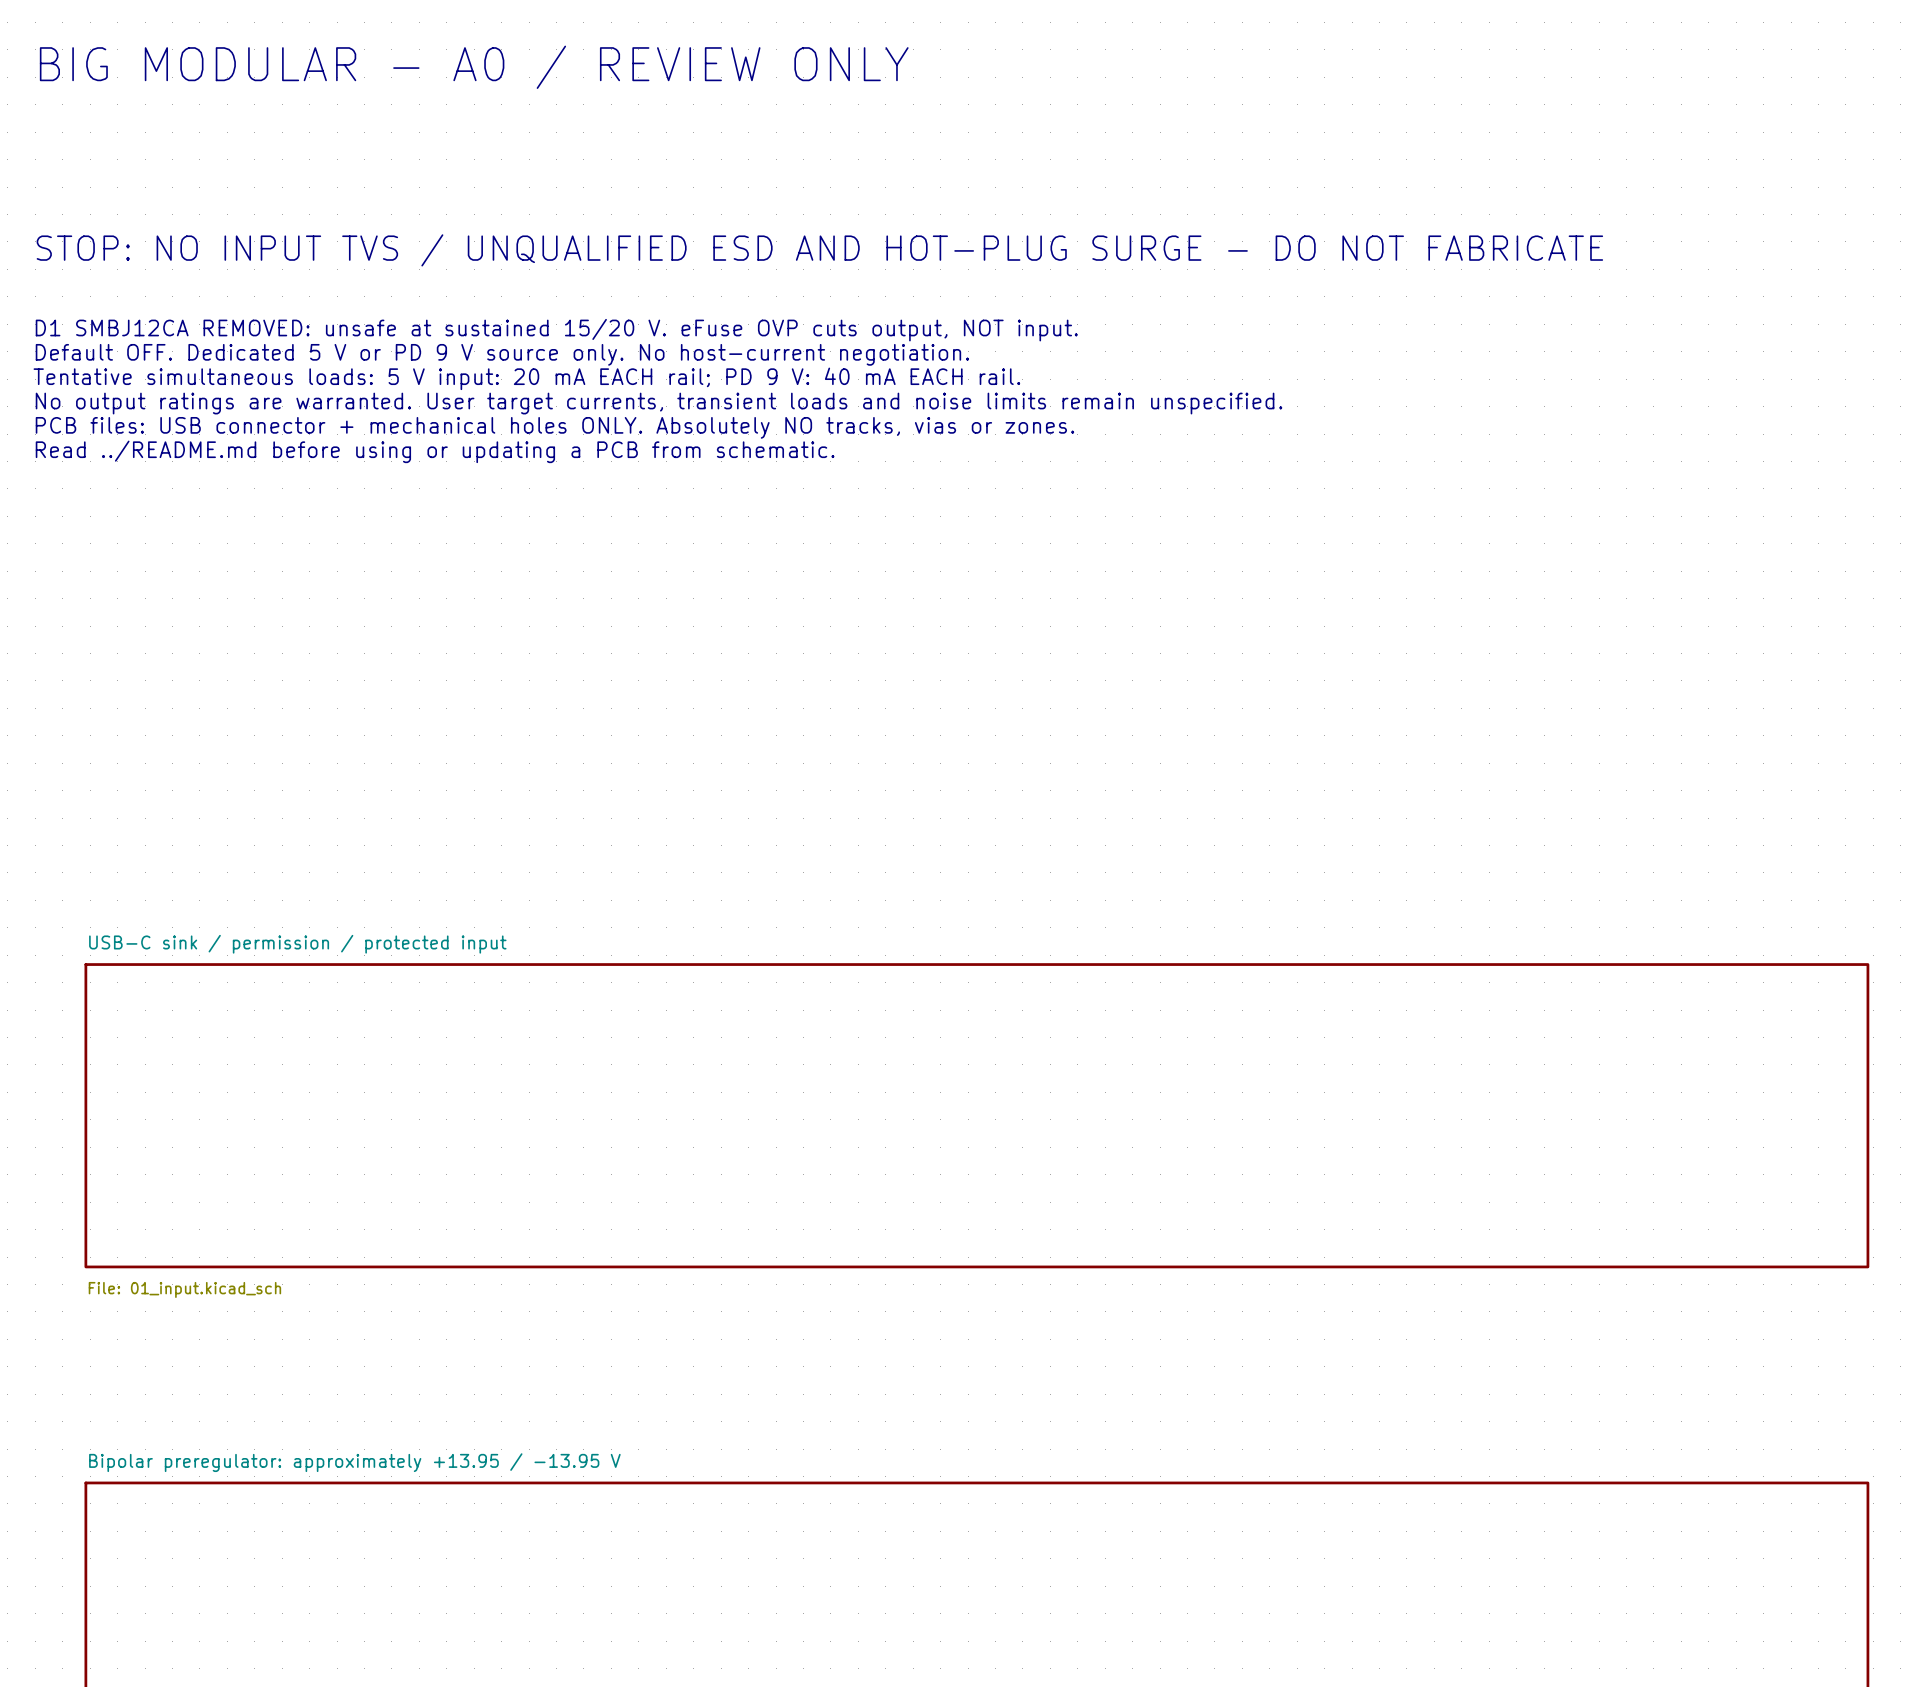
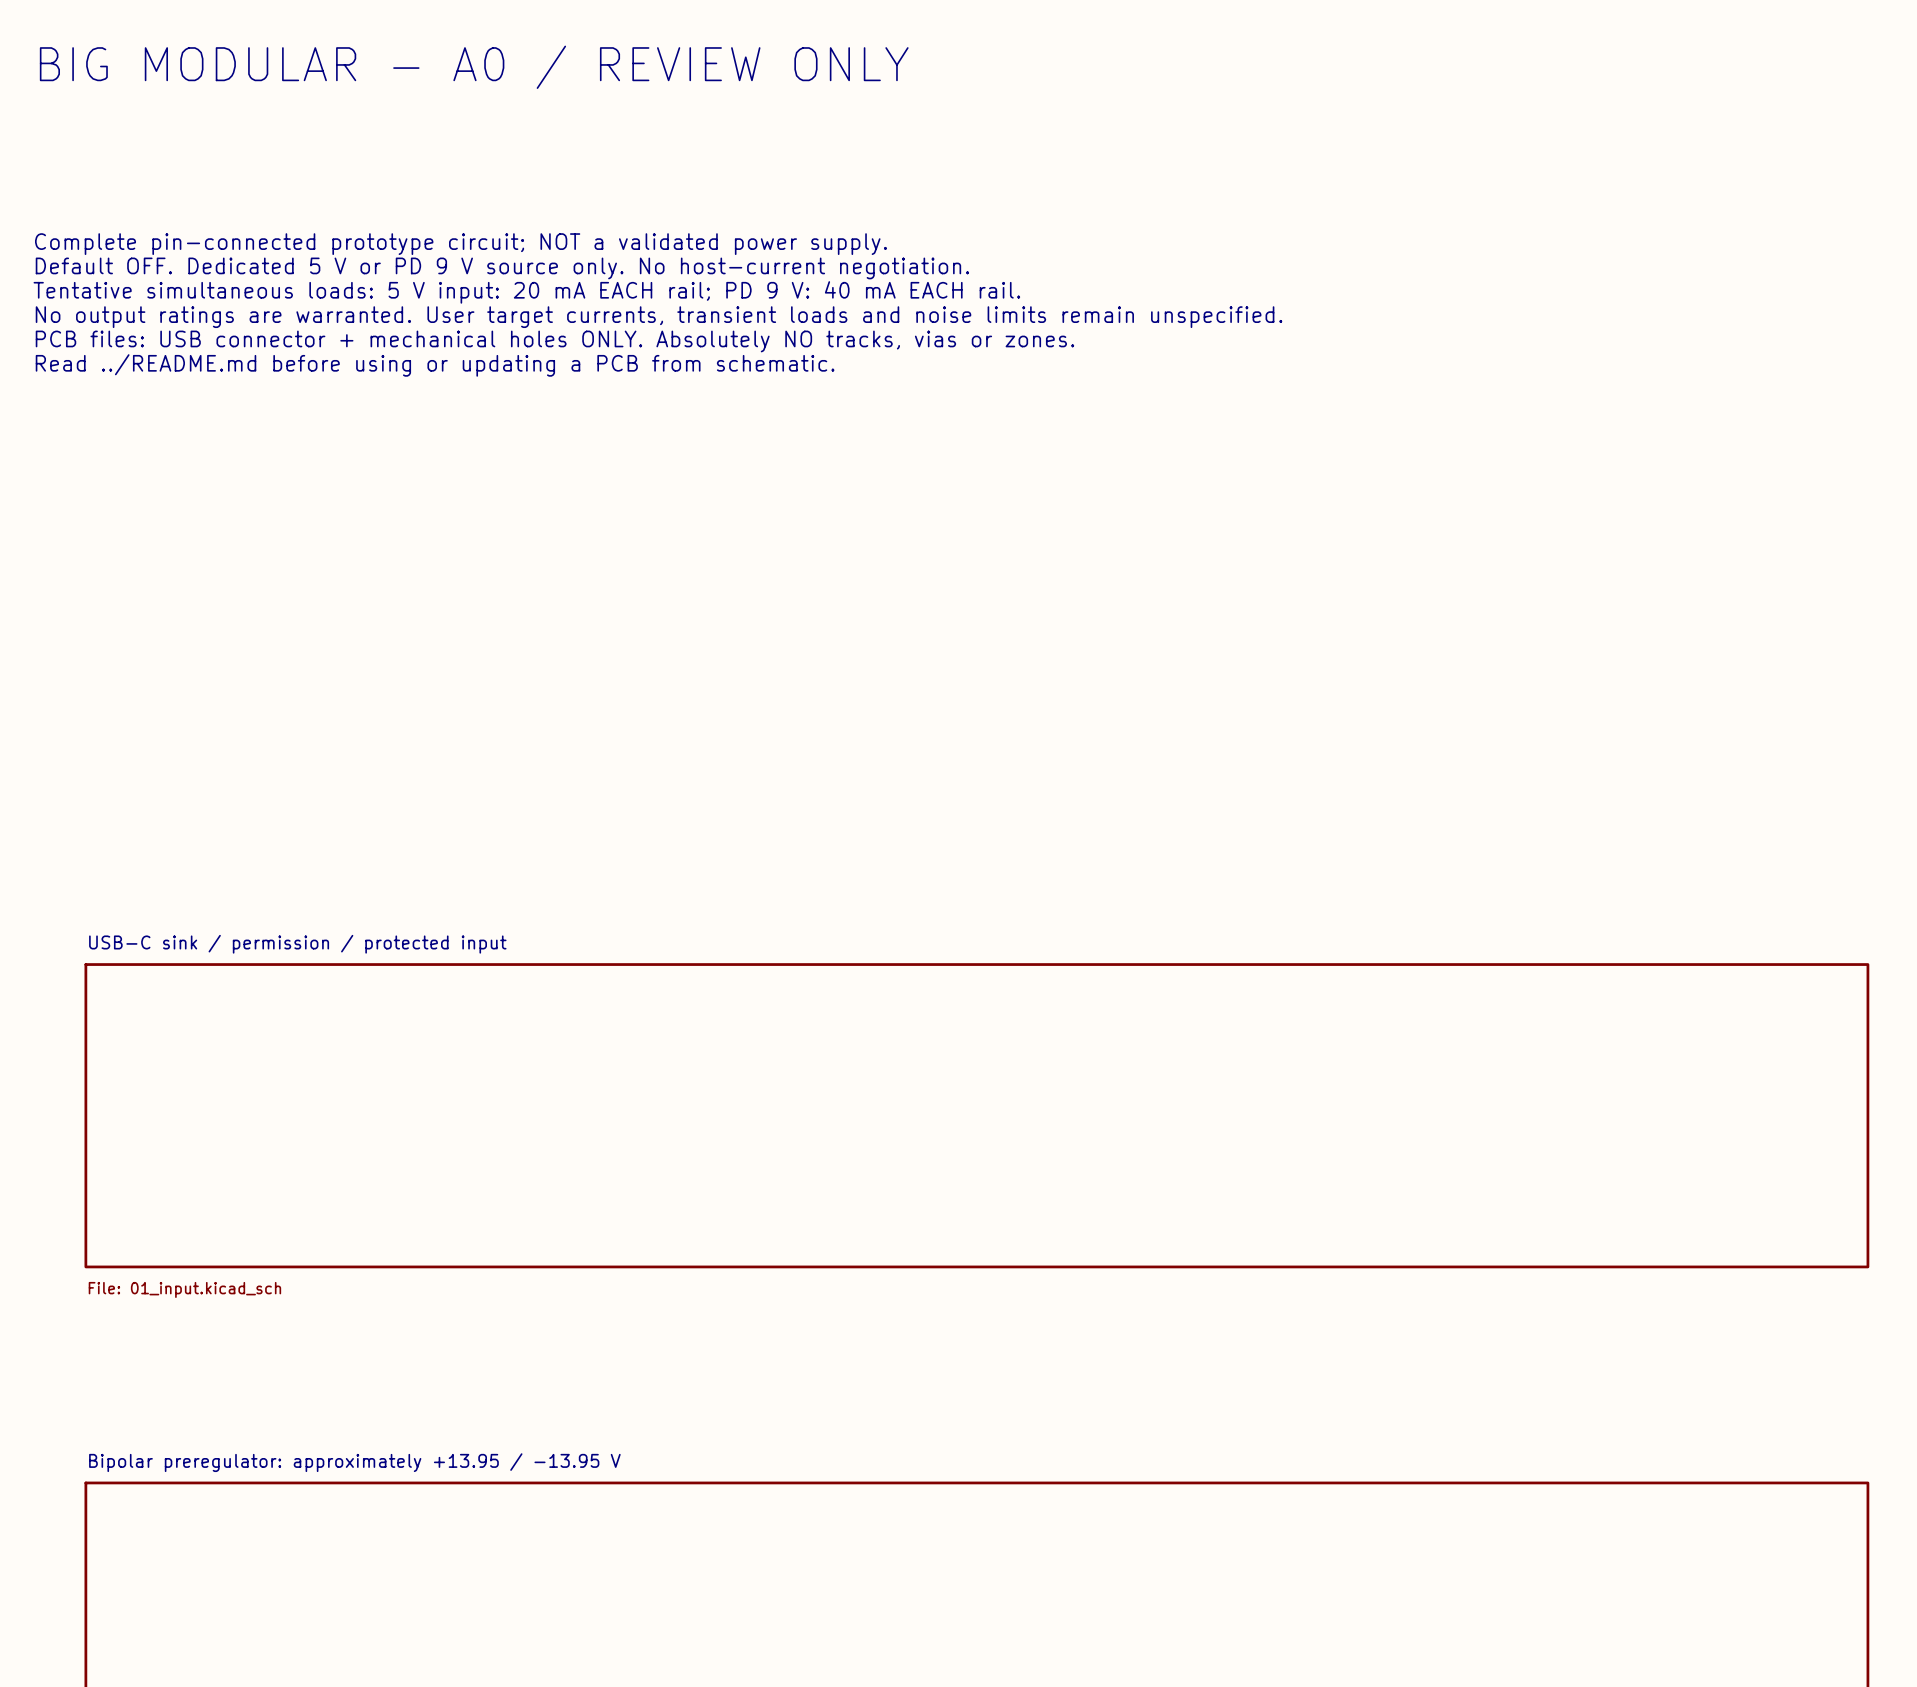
text: STOP: NO INPUT TVS / UNQUALIFIED ESD AND HOT-PLUG SURGE - DO NOT FABRICATE (819, 250) -> Complete pin-connected prototype circuit; NOT a validated power supply. (461, 244)
text: D1 SMBJ12CA REMOVED: unsafe at sustained 15/20 V. eFuse OVP cuts output, NOT input. (556, 330) -> none
text position: Default OFF. Dedicated 5 V or PD 9 V source only. No host-current negotiation. (502, 354) -> Default OFF. Dedicated 5 V or PD 9 V source only. No host-current negotiation. (502, 268)
text position: Tentative simultaneous loads: 5 V input: 20 mA EACH rail; PD 9 V: 40 mA EACH rail. (526, 378) -> Tentative simultaneous loads: 5 V input: 20 mA EACH rail; PD 9 V: 40 mA EACH rail. (526, 292)
text position: No output ratings are warranted. User target currents, transient loads and noise limits remain unspecified. (659, 403) -> No output ratings are warranted. User target currents, transient loads and noise limits remain unspecified. (659, 317)
text position: PCB files: USB connector + mechanical holes ONLY. Absolutely NO tracks, vias or zones. (554, 427) -> PCB files: USB connector + mechanical holes ONLY. Absolutely NO tracks, vias or zones. (554, 341)
text position: Read ../README.md before using or updating a PCB from schematic. (435, 451) -> Read ../README.md before using or updating a PCB from schematic. (435, 365)

